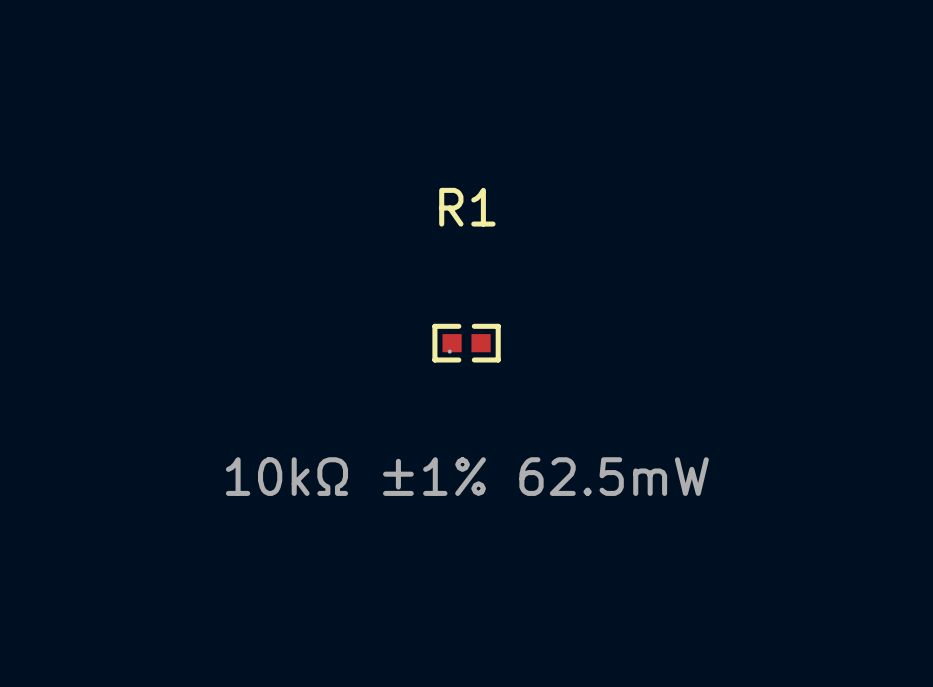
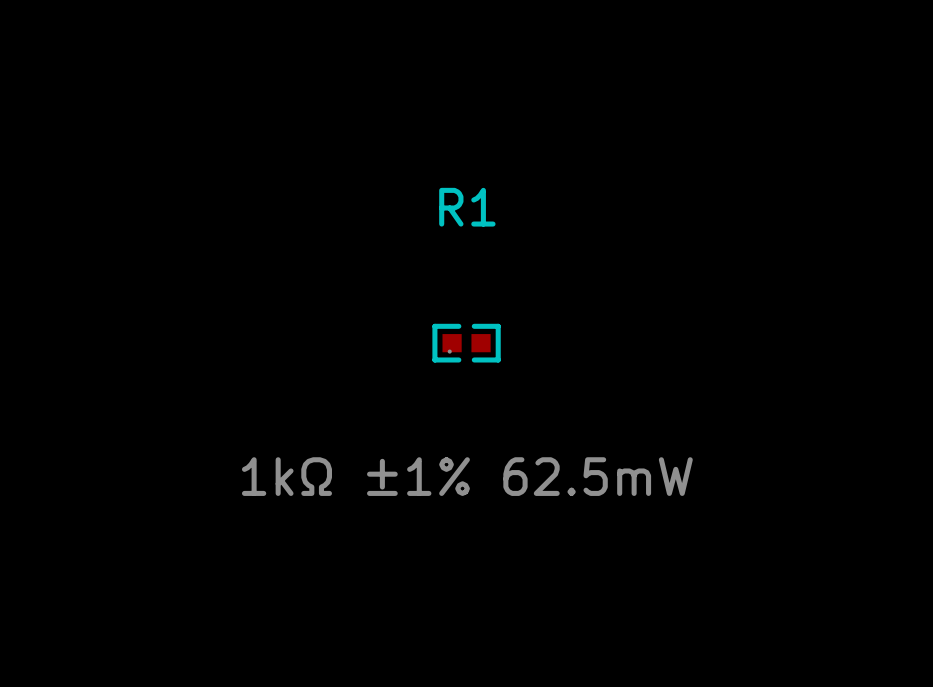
R1 value: 10kΩ ±1% 62.5mW (467, 476) -> 1kΩ ±1% 62.5mW (467, 476)

